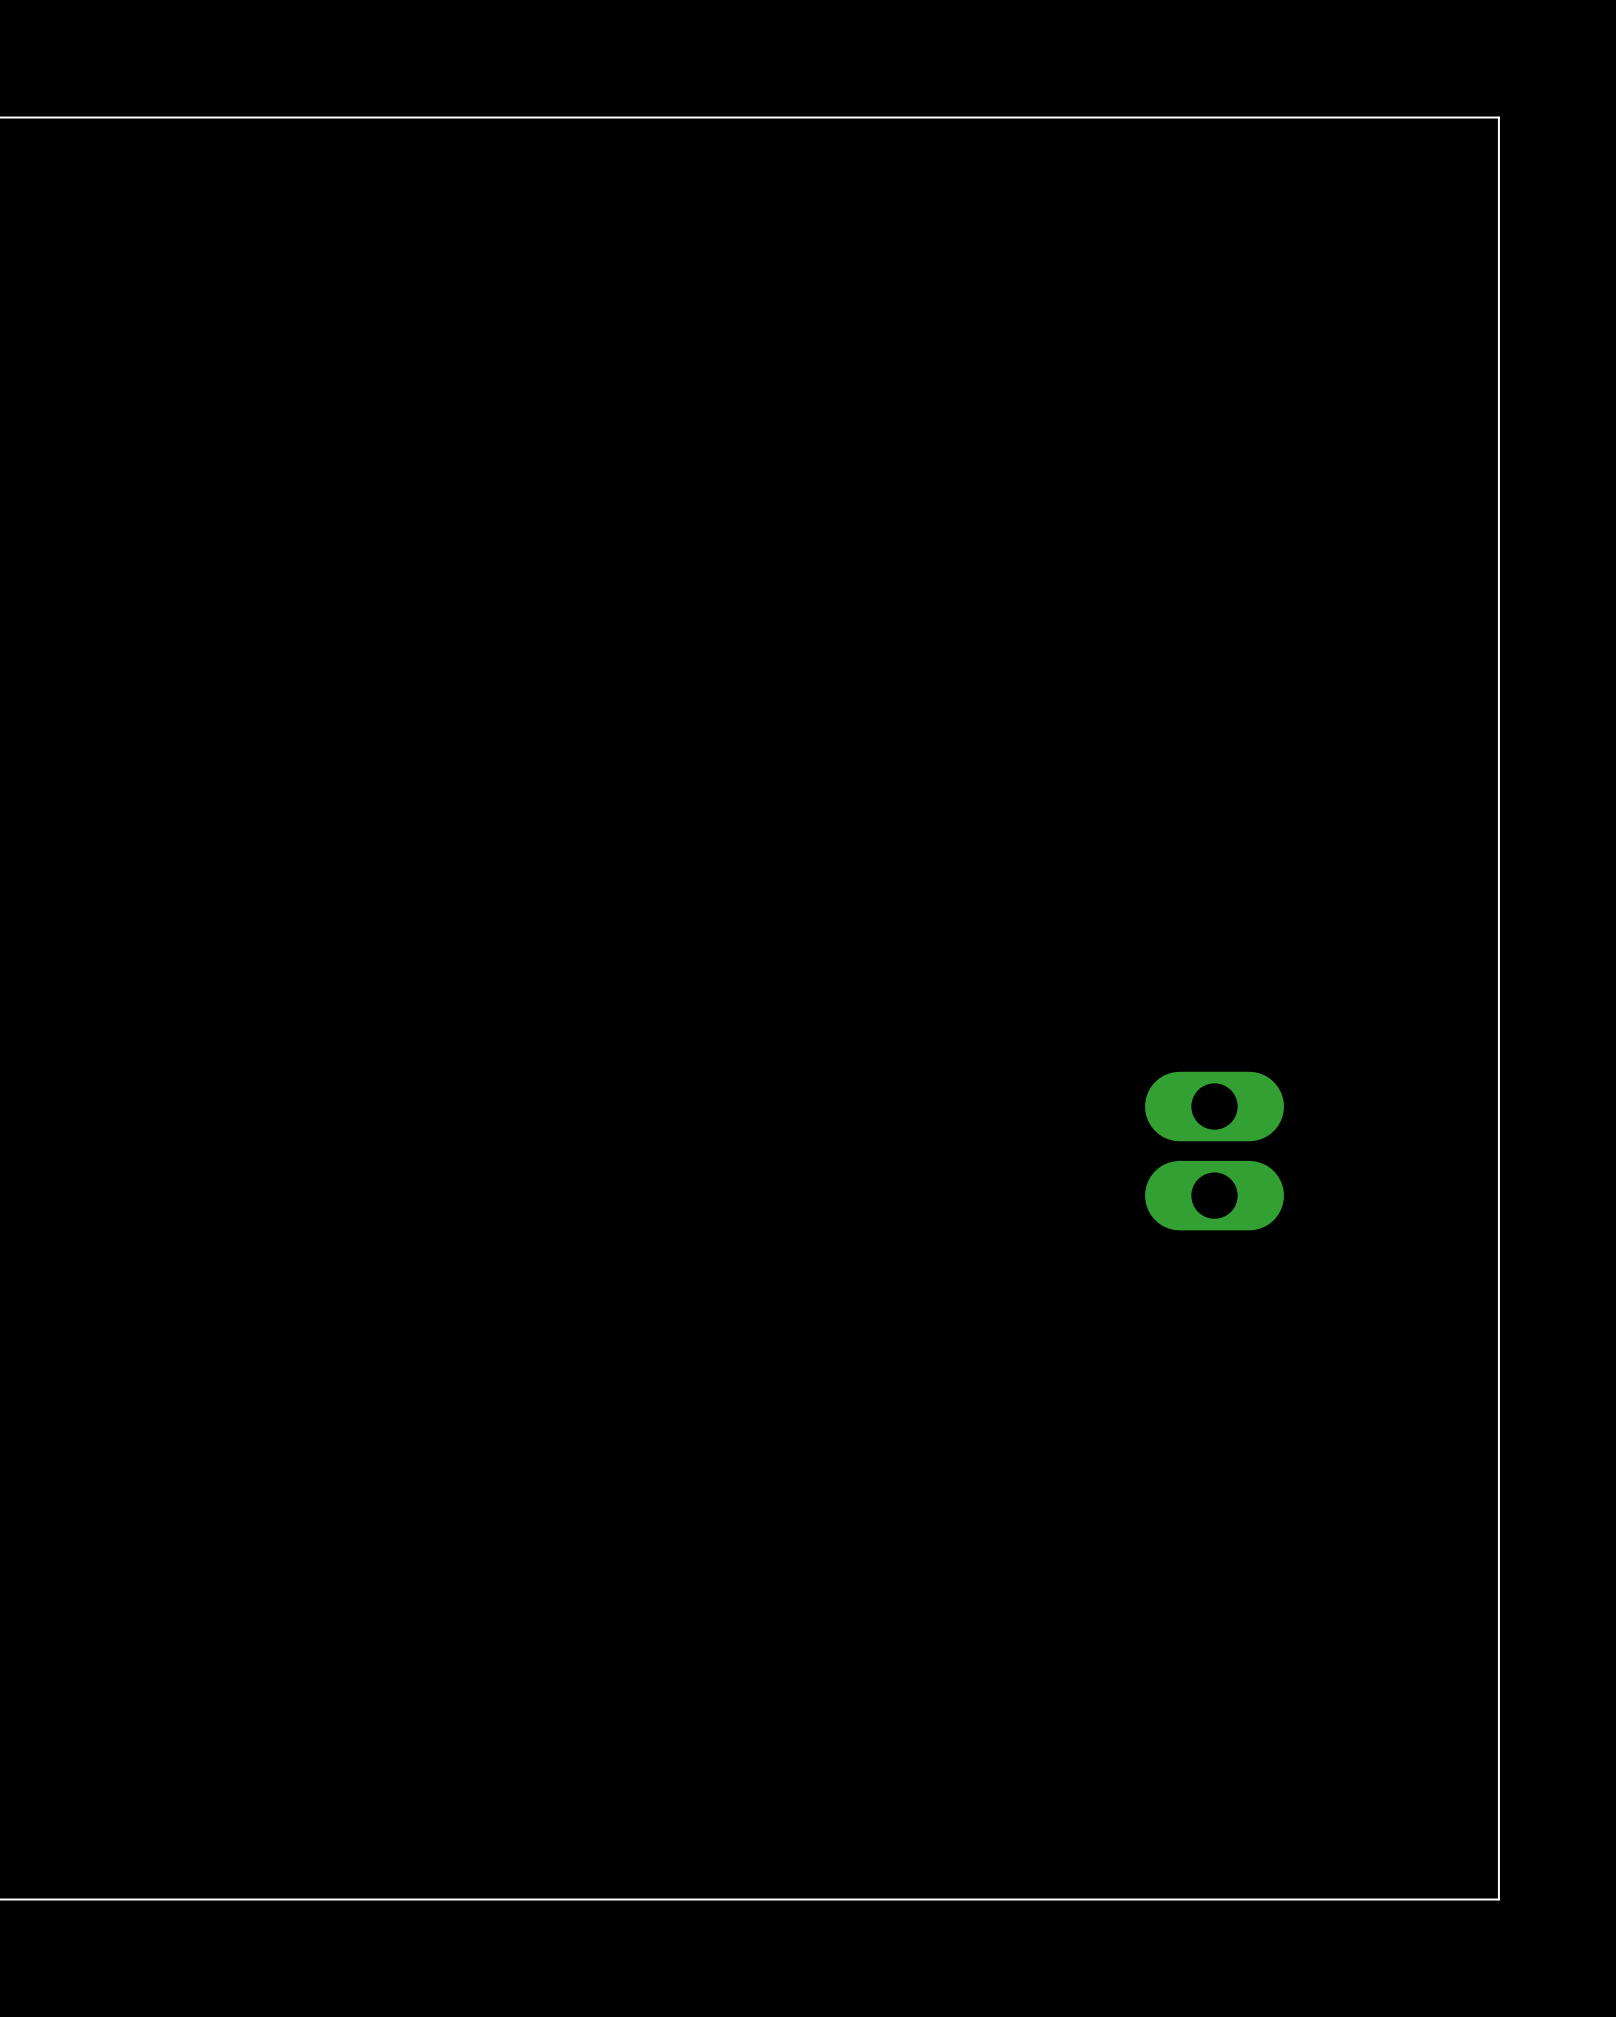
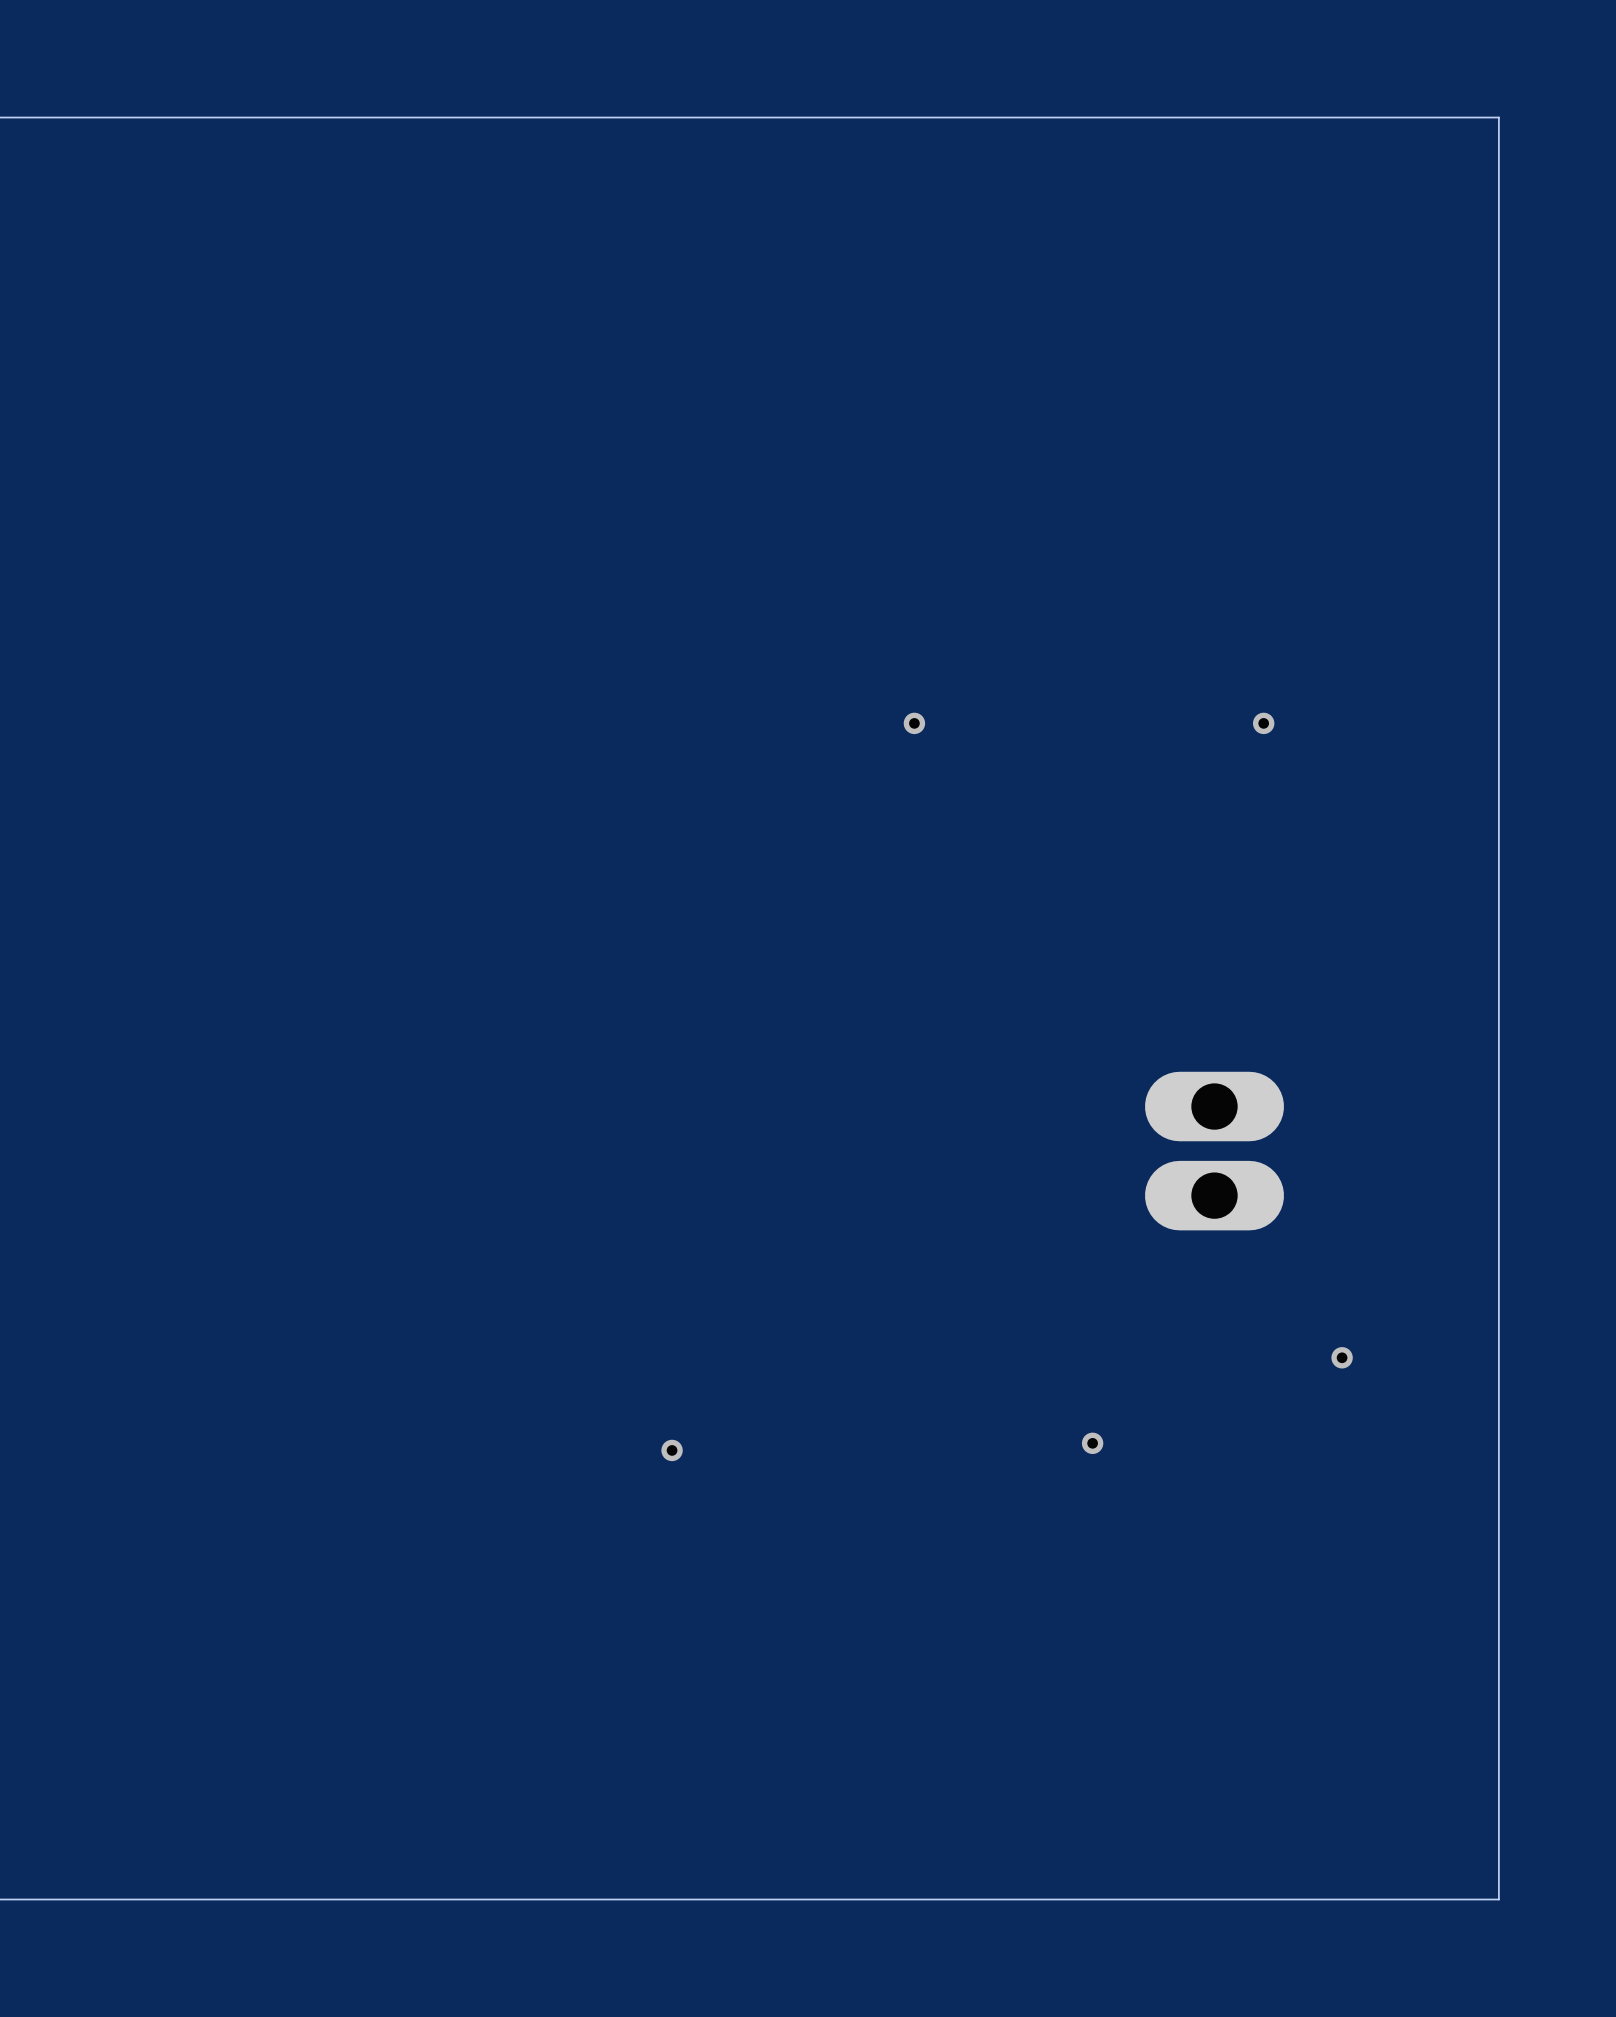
via: none -> (914, 723)
via: none -> (1263, 723)
via: none -> (1342, 1357)
via: none -> (1092, 1443)
via: none -> (672, 1450)

